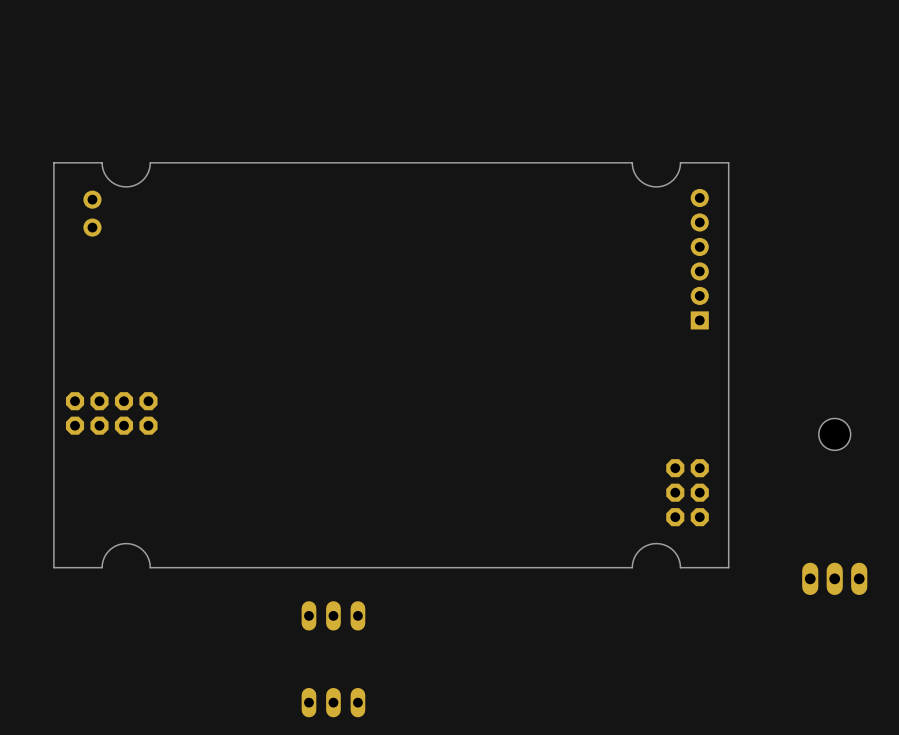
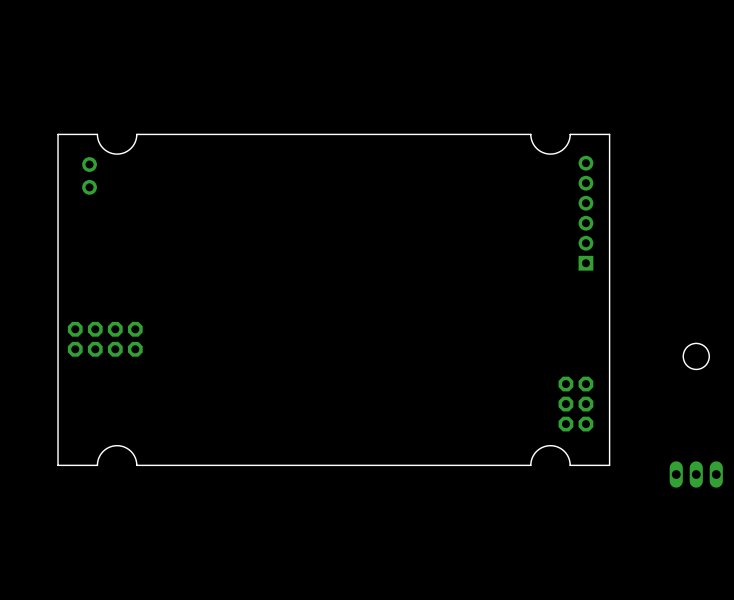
part: (333, 615) -> none
part: (333, 702) -> none

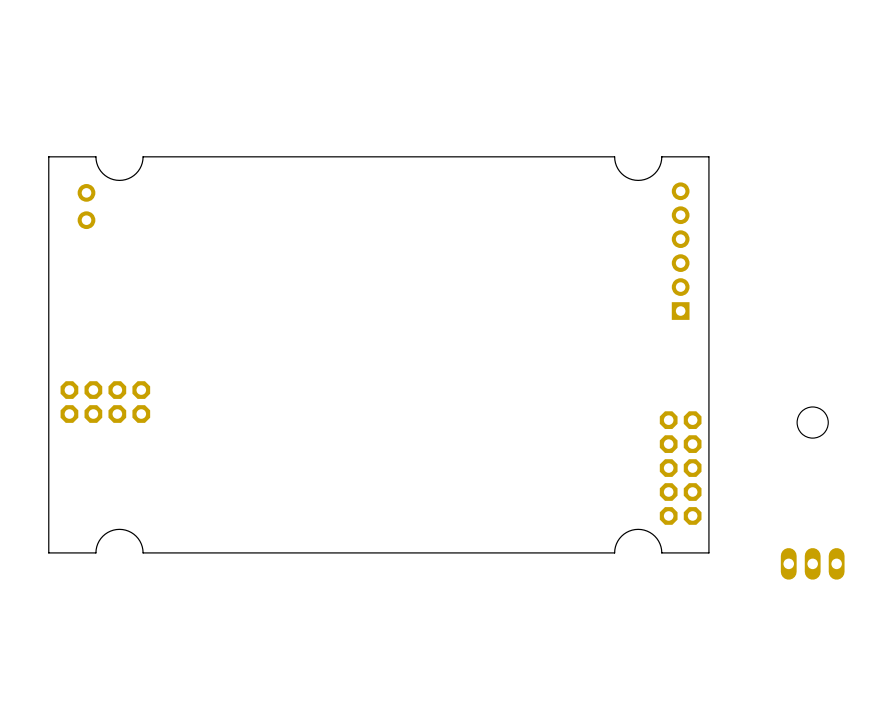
part: none -> (680, 468)
part: (575, 404) -> none

